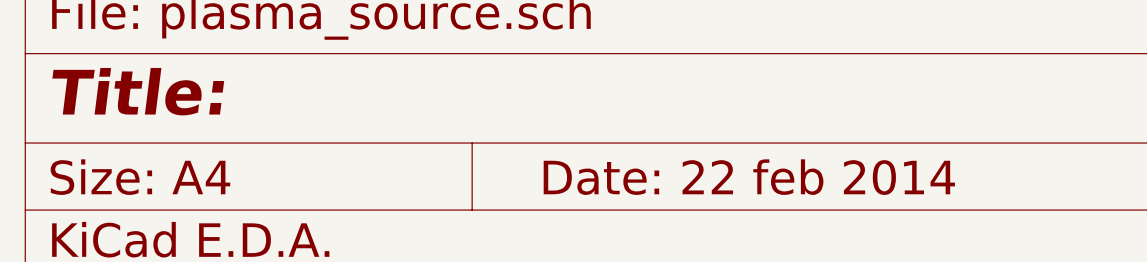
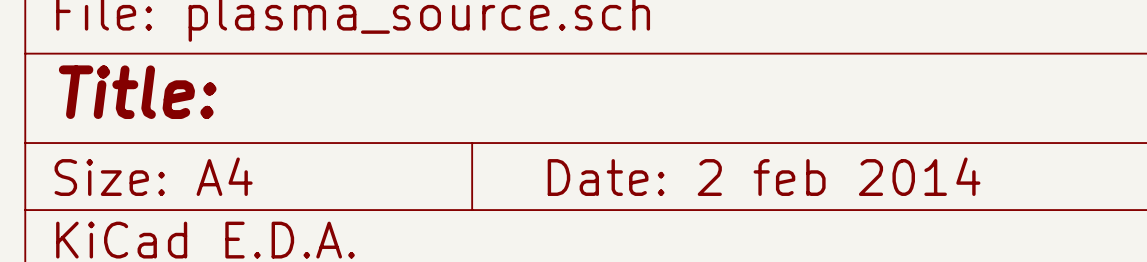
title block: Date: 22 feb 2014 (749, 177) -> Date: 2 feb 2014 (764, 176)

